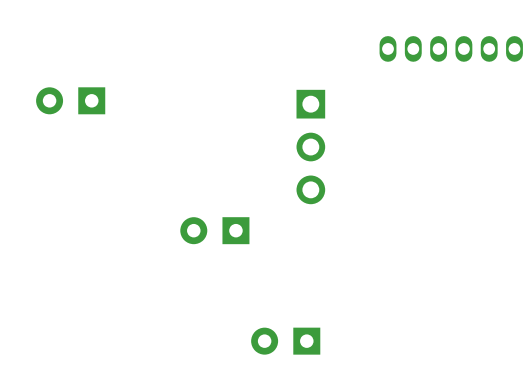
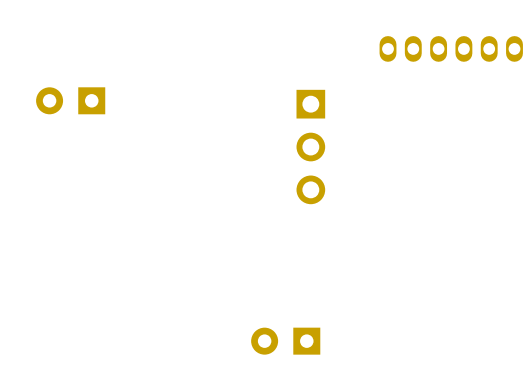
part: (214, 230) -> none

